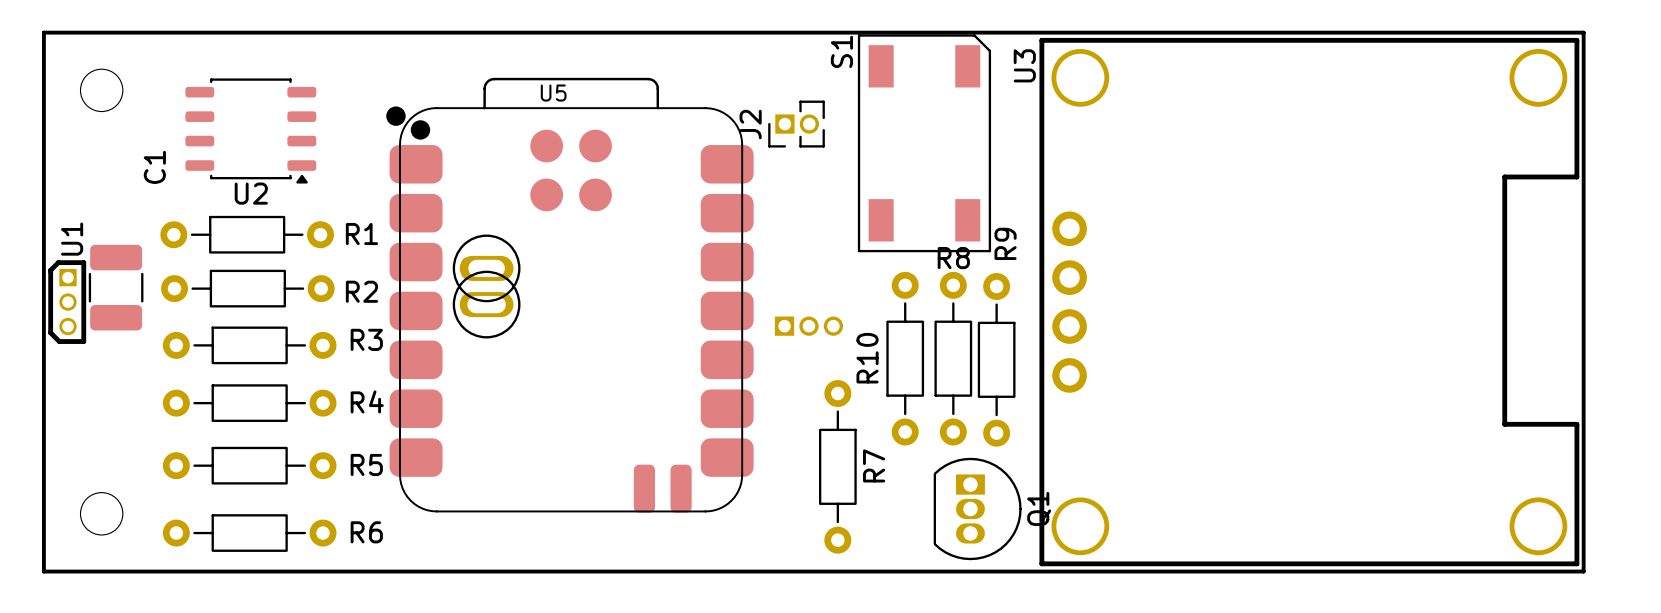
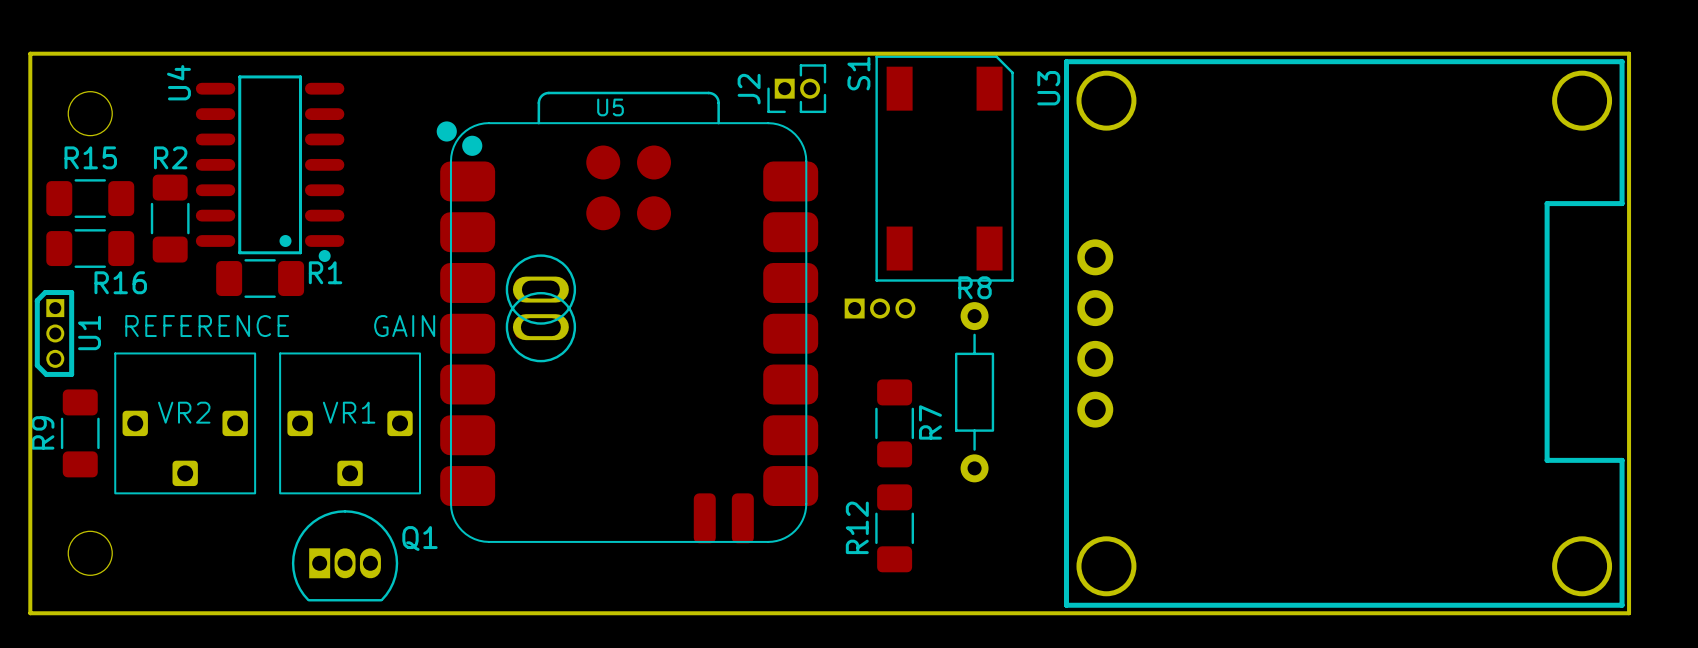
J2 position: (796, 124) -> (796, 88)
U2: (250, 130) -> none
U4: none -> (270, 168)
R16: none -> (90, 198)
R1 footprint: [160, 215, 334, 254] -> [216, 259, 305, 298]
R15: none -> (90, 248)
R1 name position: R1 (361, 234) -> R1 (325, 272)
U1 name position: U1 (72, 239) -> U1 (89, 333)
R9 name position: R9 (1005, 243) -> R9 (42, 432)
part position: (486, 268) -> (540, 289)
R2 footprint: [161, 269, 335, 308] -> [150, 174, 190, 263]
R9 footprint: [977, 273, 1016, 447] -> [60, 389, 100, 478]
C1: (116, 287) -> none
R2 name position: R2 (361, 291) -> R2 (170, 157)
text: none -> REFERENCE (207, 326)
text: none -> GAIN (404, 326)
U5 position: (569, 295) -> (627, 317)
part position: (486, 304) -> (540, 327)
part position: (808, 326) -> (880, 308)
R3: (249, 345) -> none
R10: (905, 358) -> none
R7 footprint: [818, 380, 857, 554] -> [875, 379, 915, 468]
VR2: none -> (185, 423)
VR1: none -> (350, 423)
R4: (249, 403) -> none
R5: (249, 465) -> none
R12: none -> (894, 528)
Q1 rotation: 0° (977, 508) -> 90° counterclockwise (345, 555)
Q1 position: (977, 508) -> (345, 555)
R6: (249, 533) -> none

